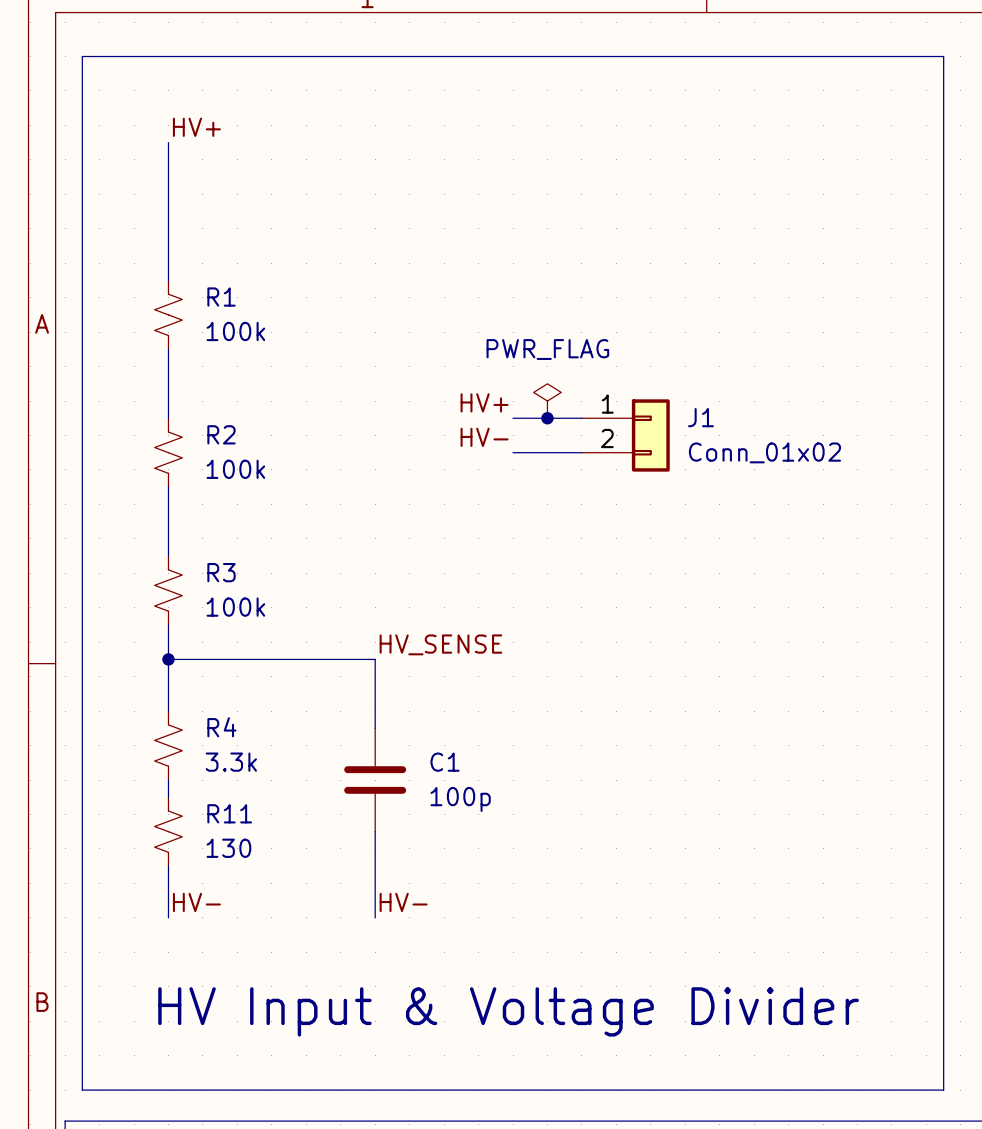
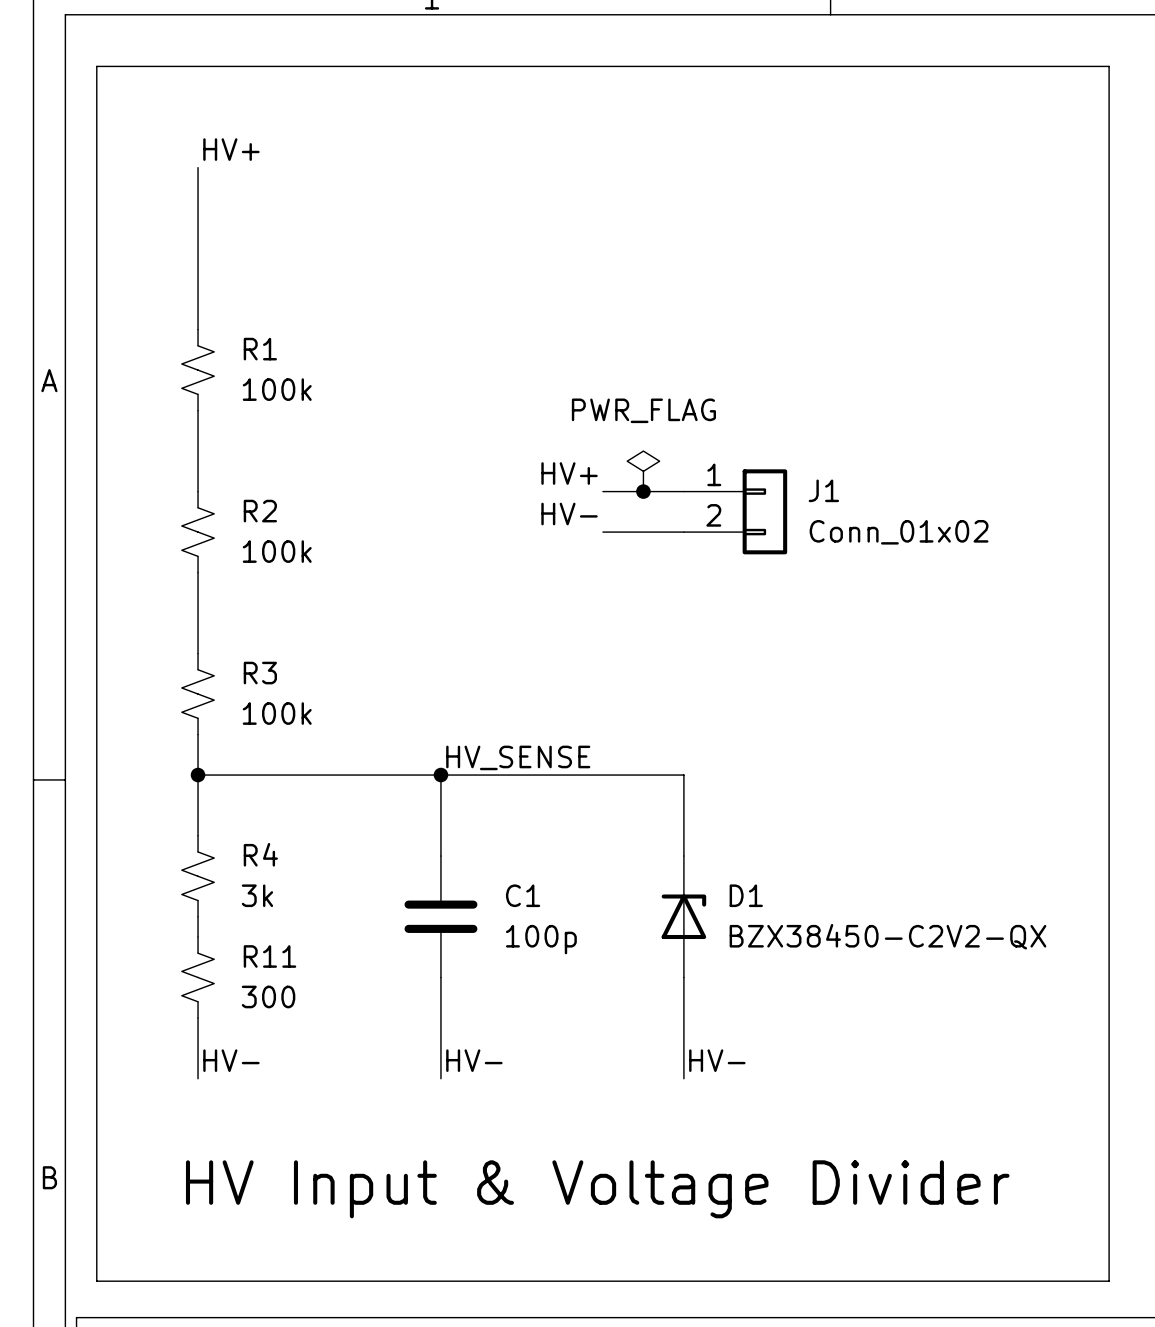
wire: none -> (440, 775) (683, 775) (683, 856)
junction: none -> (440, 775)
R4 value: 3.3k (231, 762) -> 3k (257, 895)
D1: none -> BZX38450-C2V2-QX (683, 916)
wire: none -> (683, 977) (683, 1078)
R11 value: 130 (228, 848) -> 300 (268, 996)
label: none -> HV- (717, 1060)

